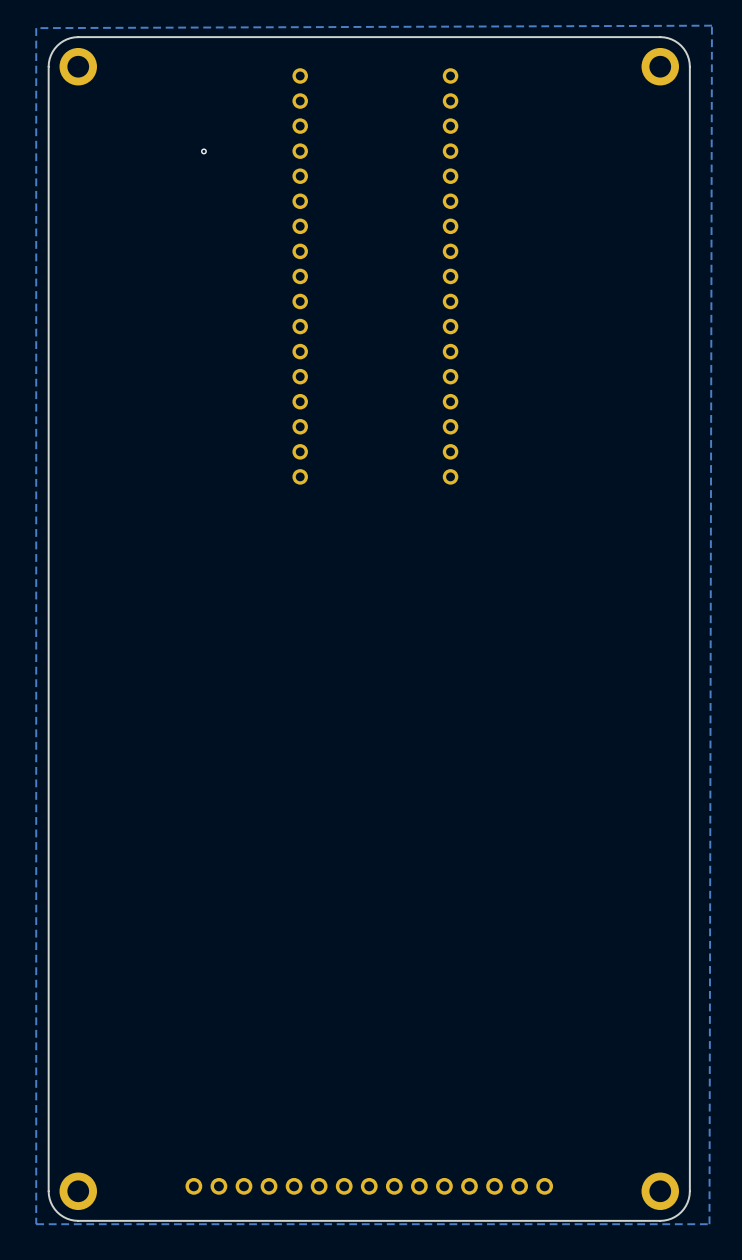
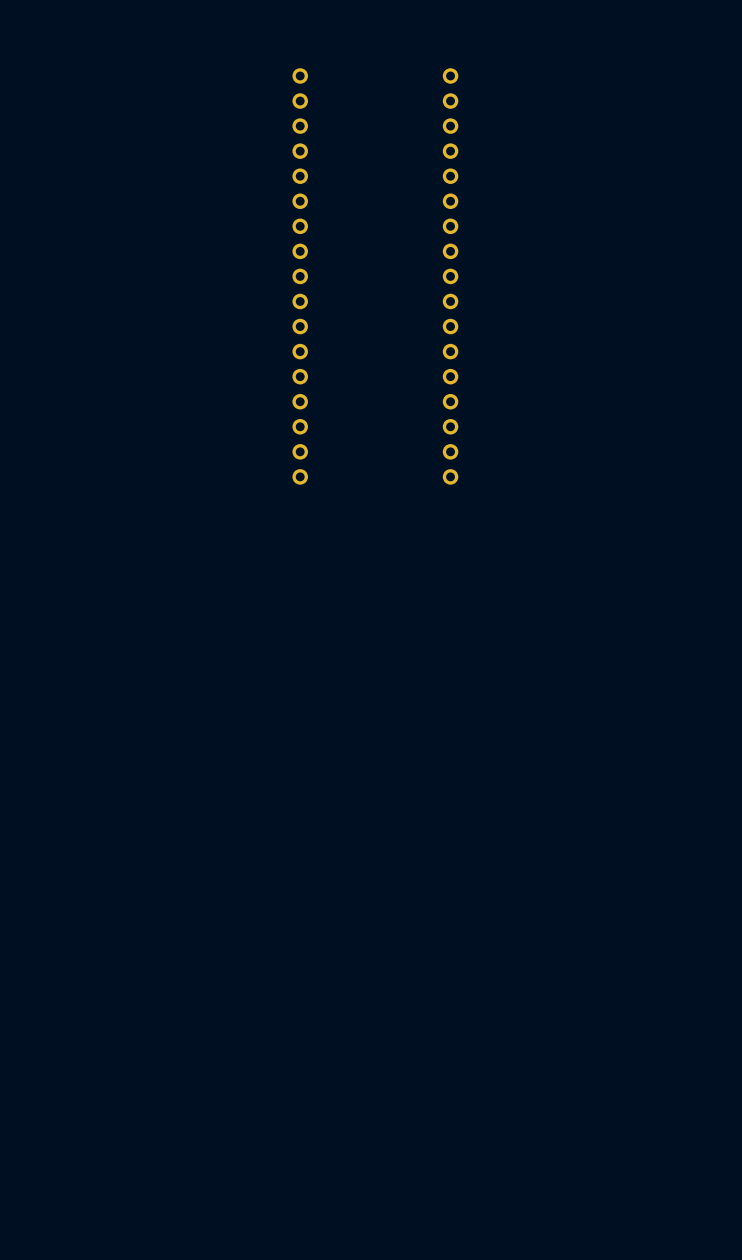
zone outline: (711, 25) (709, 1224) (36, 1224) (36, 28) (711, 25) -> none
board edge: (660, 37) (78, 37) (63, 41) (52, 51) (48, 66) (48, 1191) (52, 1206) (63, 1216) (78, 1220) (660, 1220) (675, 1216) (685, 1206) (689, 1191) (689, 66) (687, 55) (681, 45) (671, 39) (660, 37) -> none
part: (78, 66) -> none
part: (660, 66) -> none
via: (203, 151) -> none
part: (369, 1186) -> none
part: (78, 1191) -> none
part: (660, 1191) -> none

